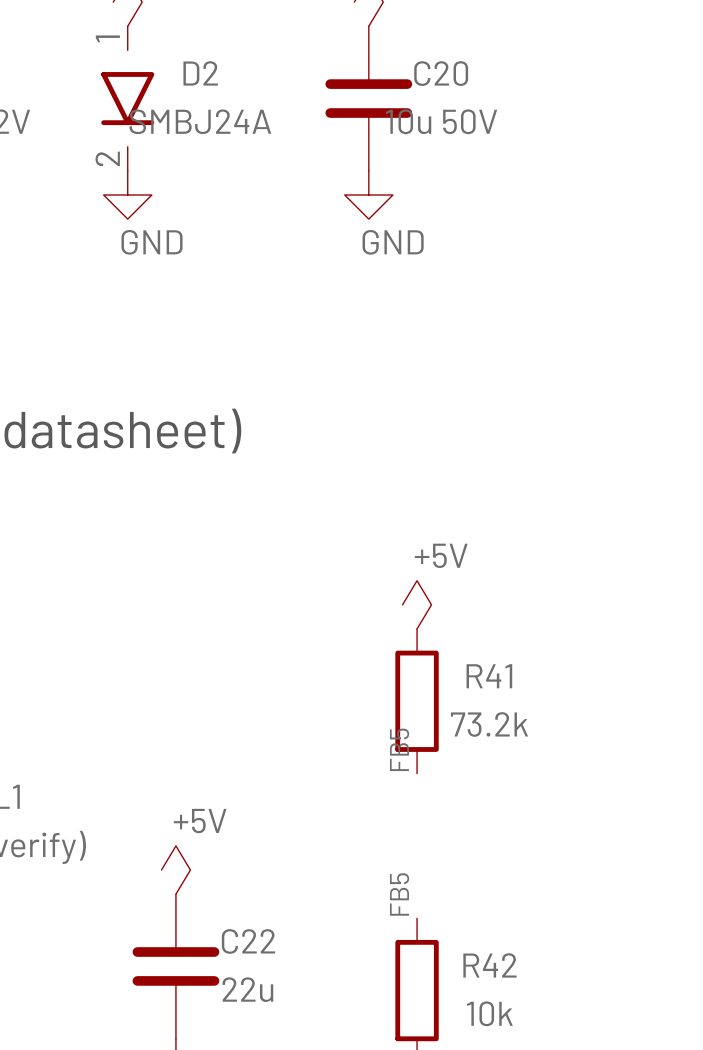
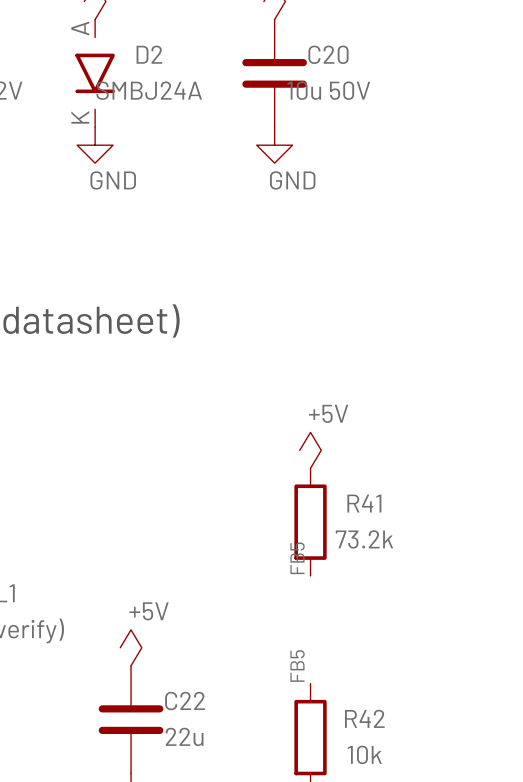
D2 pin name: 1 (107, 38) -> A (80, 28)
D2 pin name: 2 (107, 158) -> K (80, 117)

